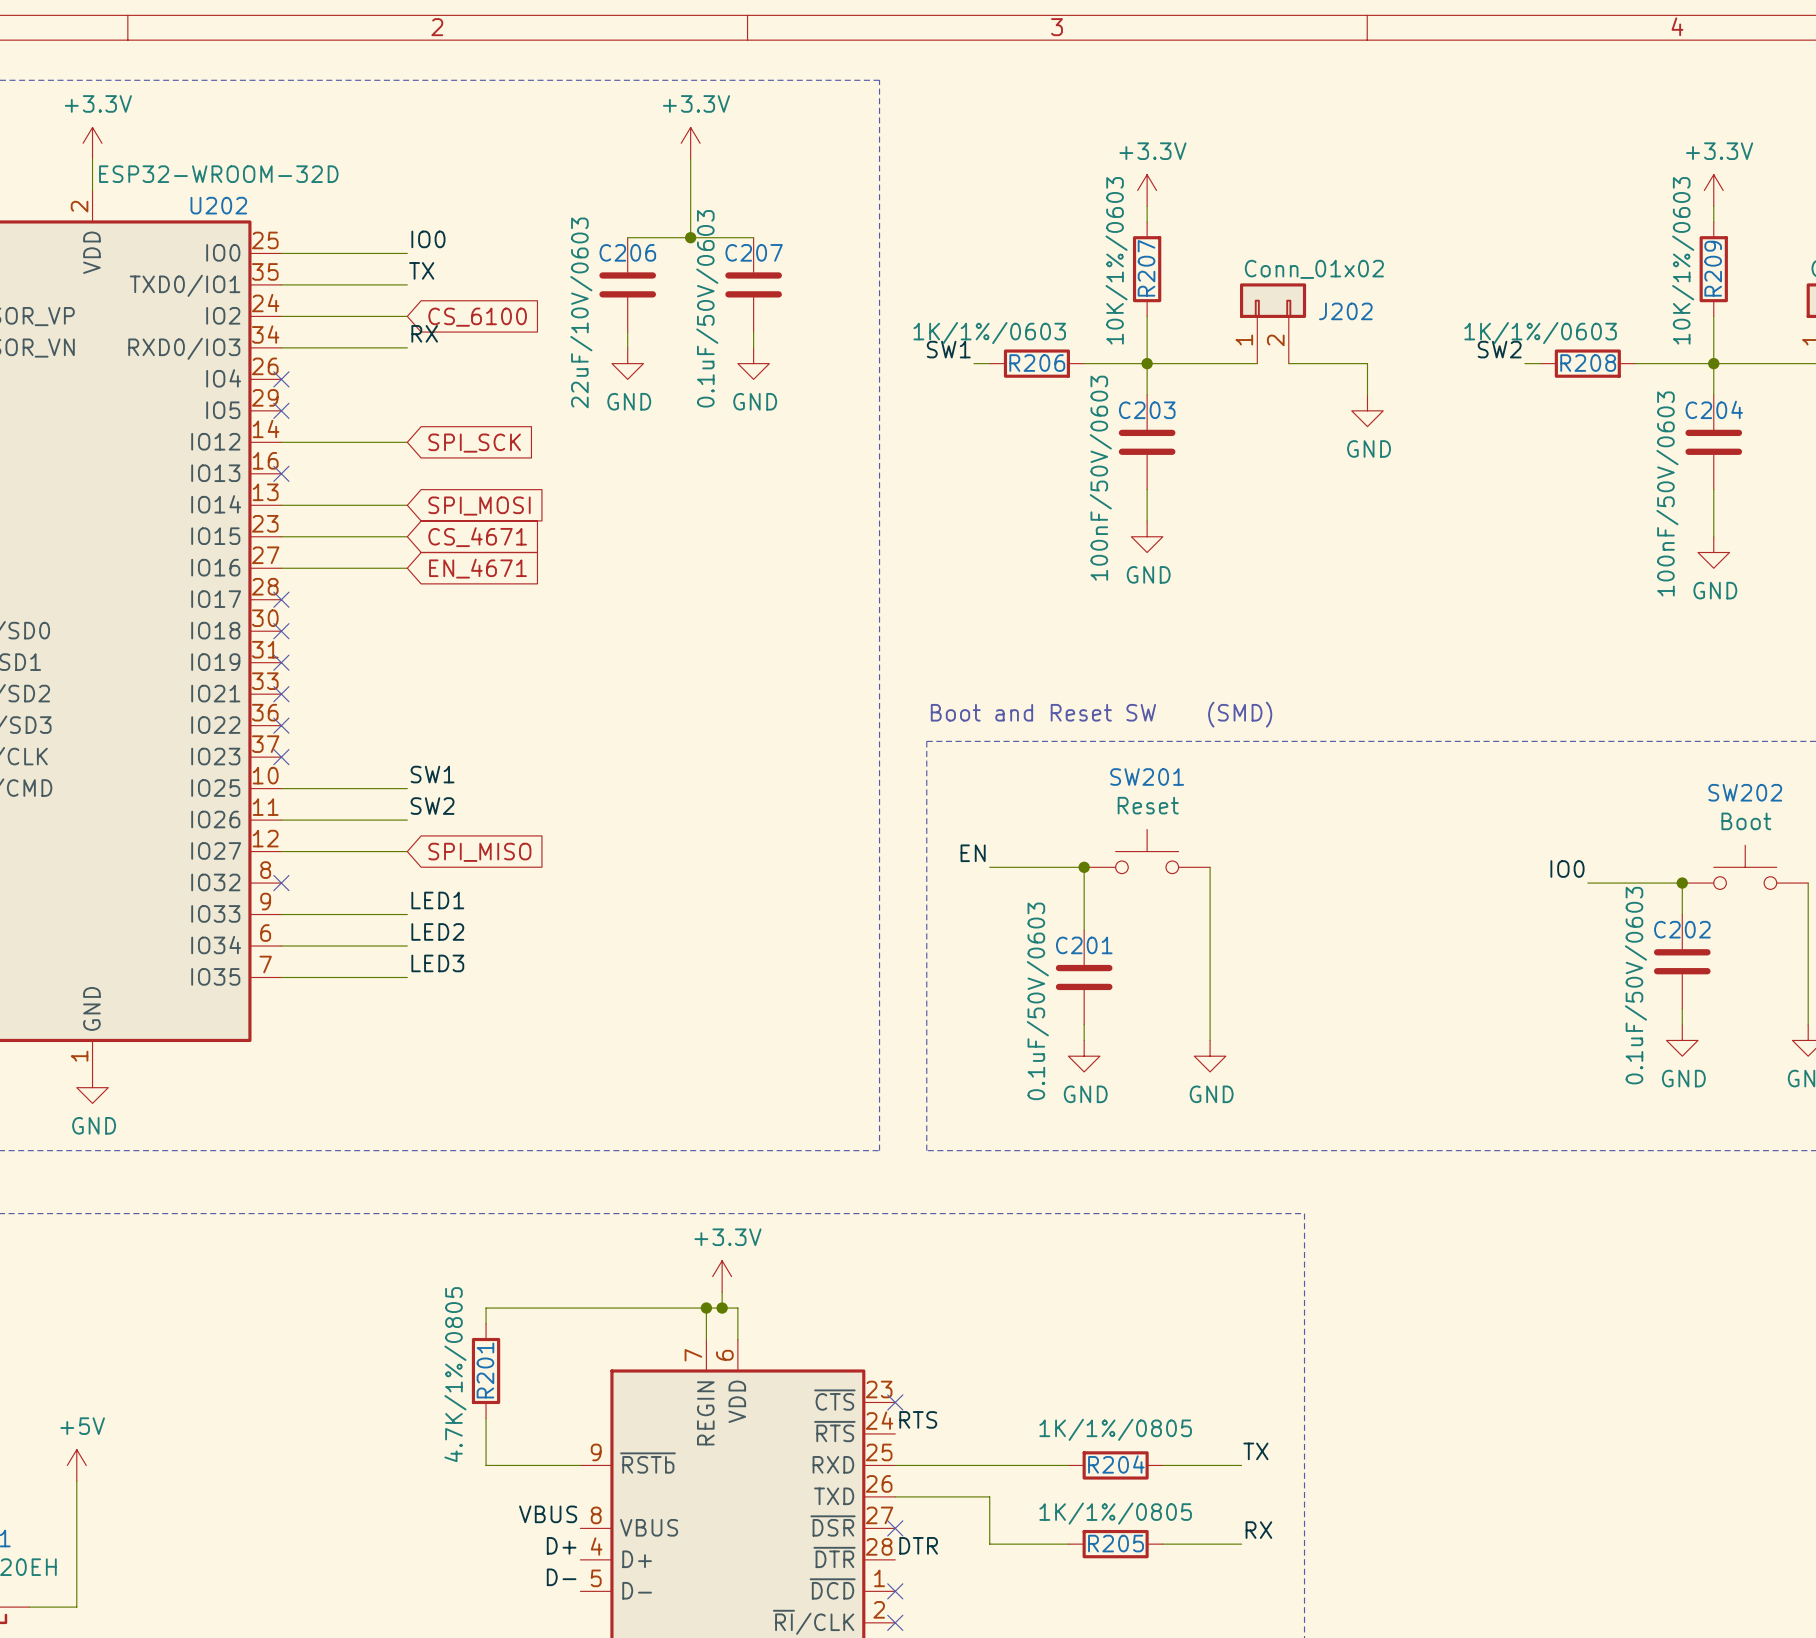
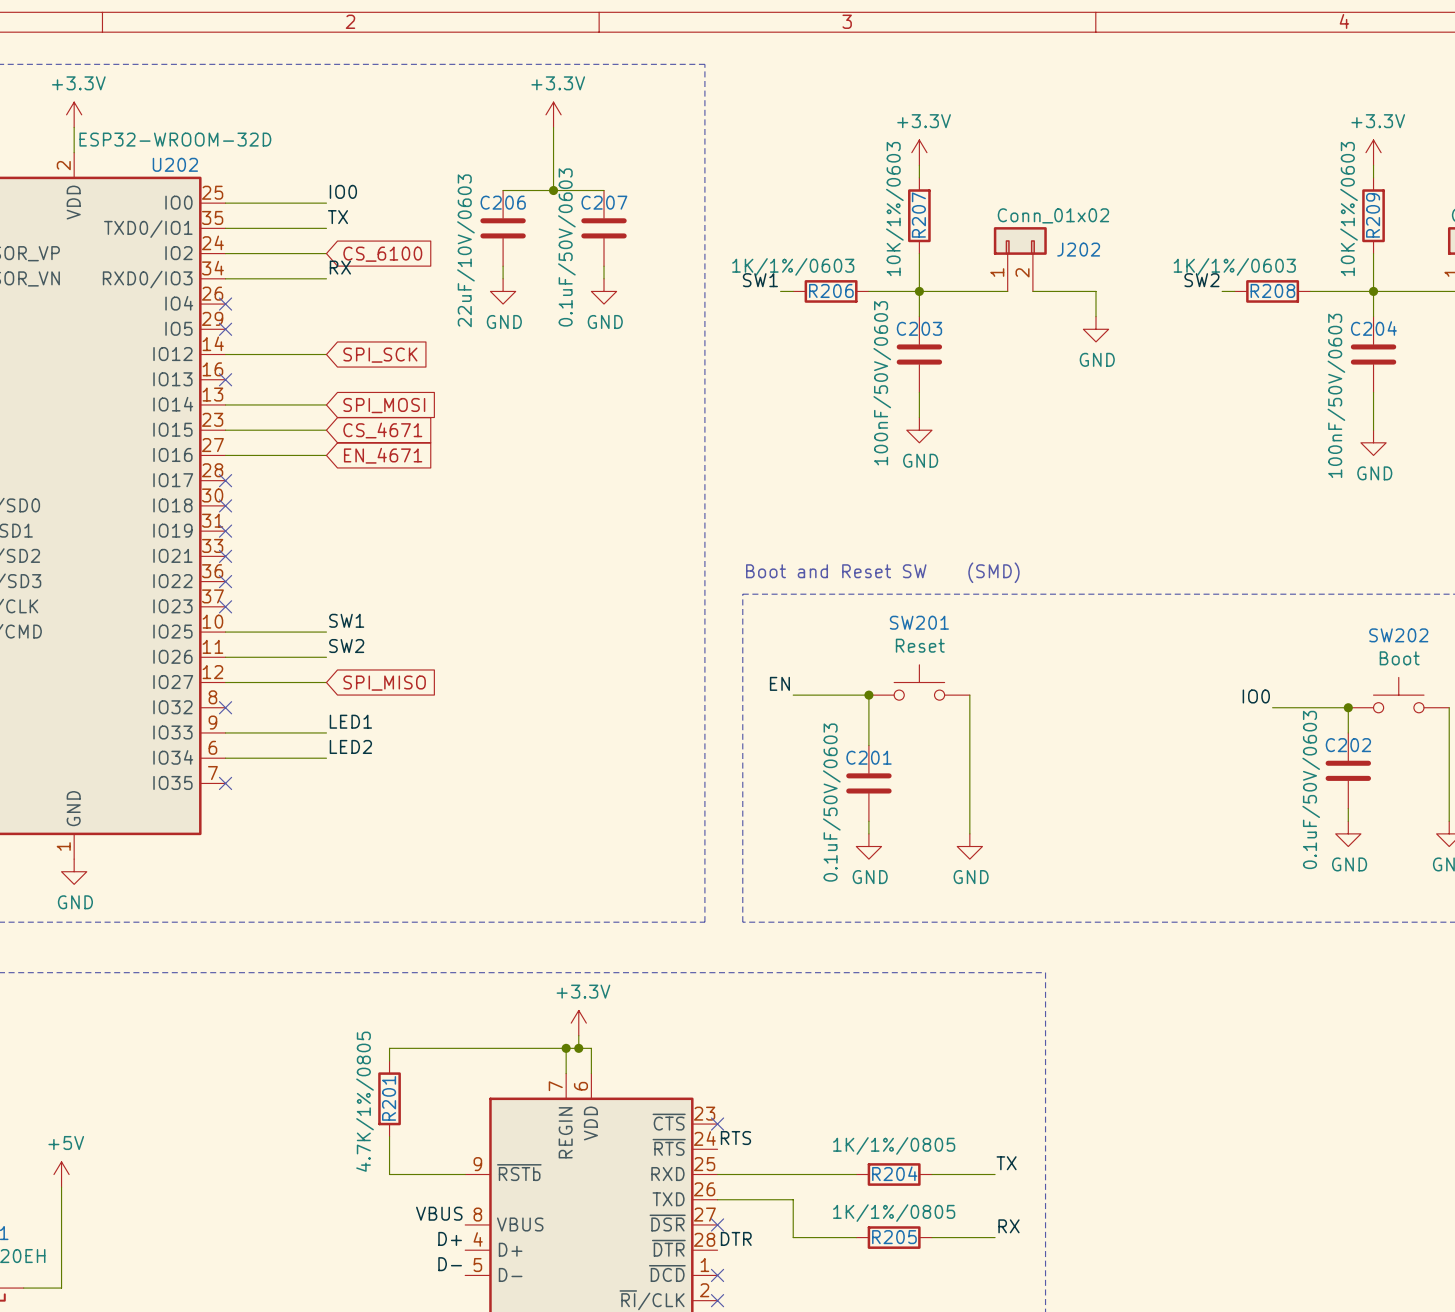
label: LED3 (437, 963) -> none
wire: (281, 977) (407, 977) -> none
no-connect mark: none -> (225, 783)

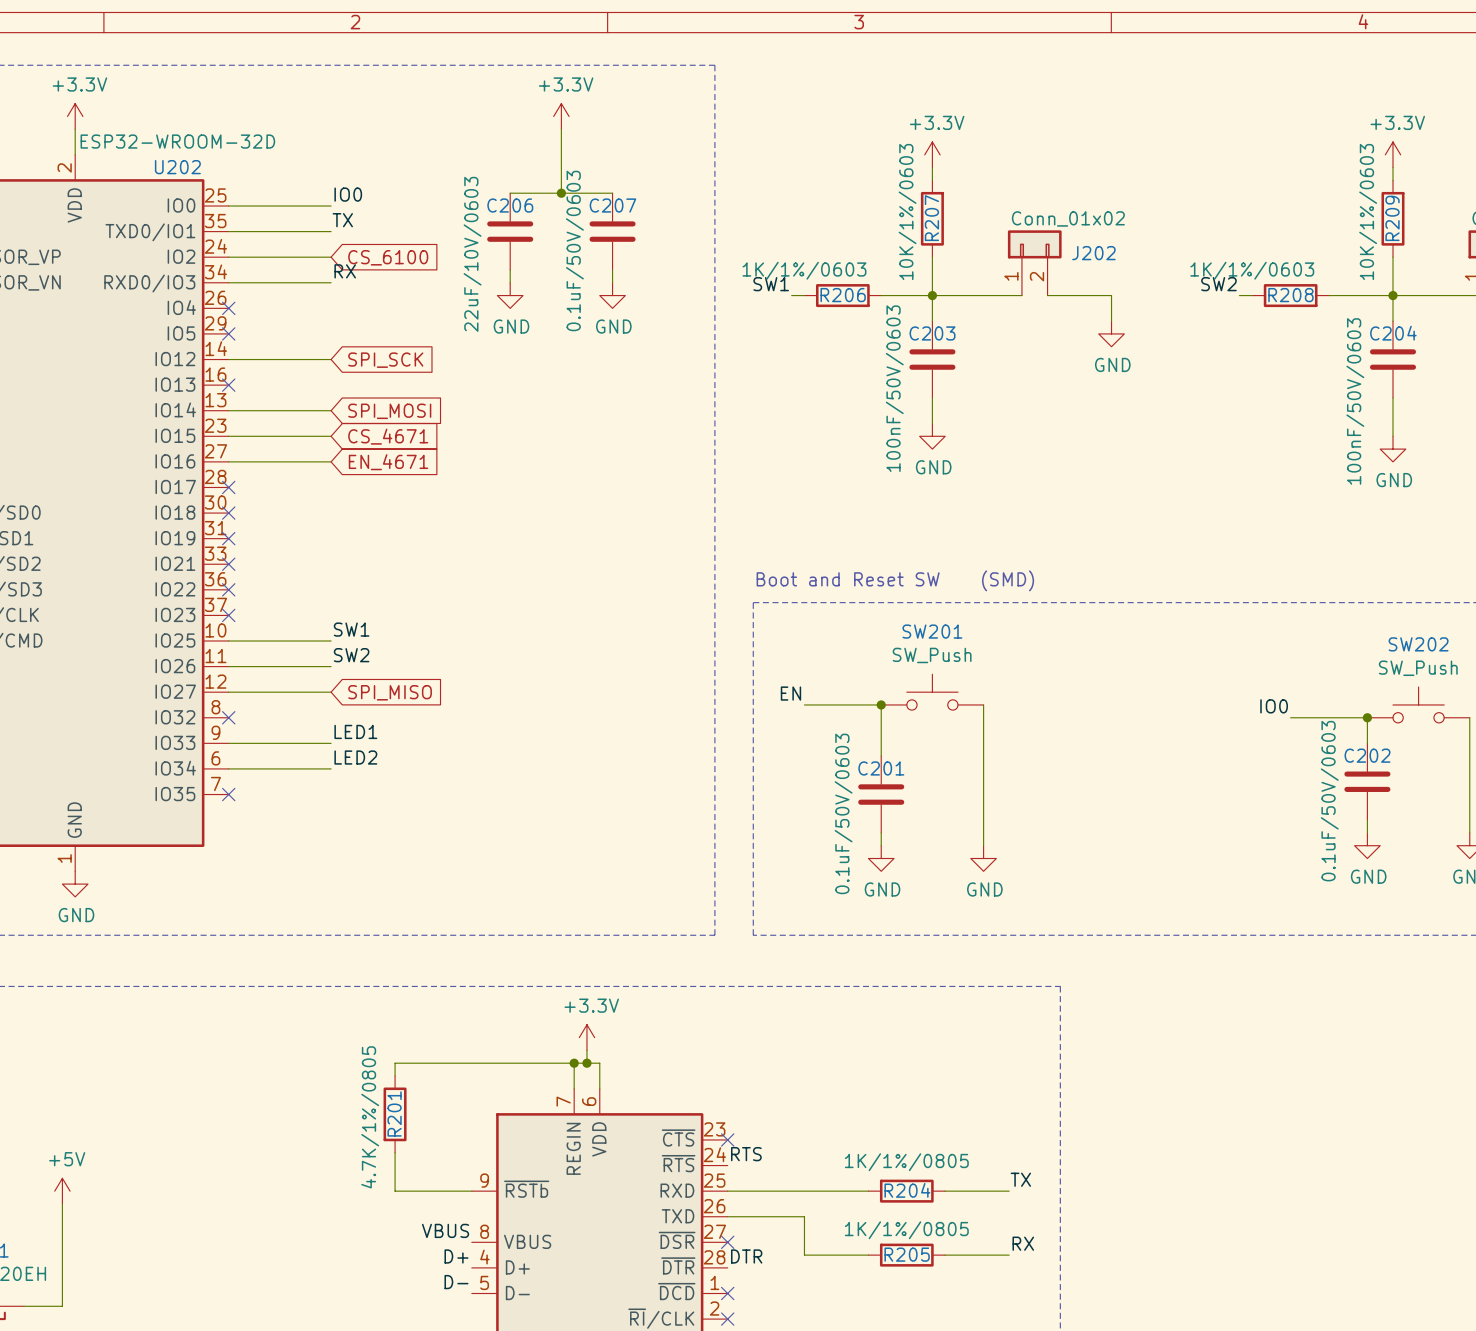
SW201 value: Reset (920, 645) -> SW_Push (932, 655)
SW202 value: Boot (1399, 658) -> SW_Push (1418, 668)

